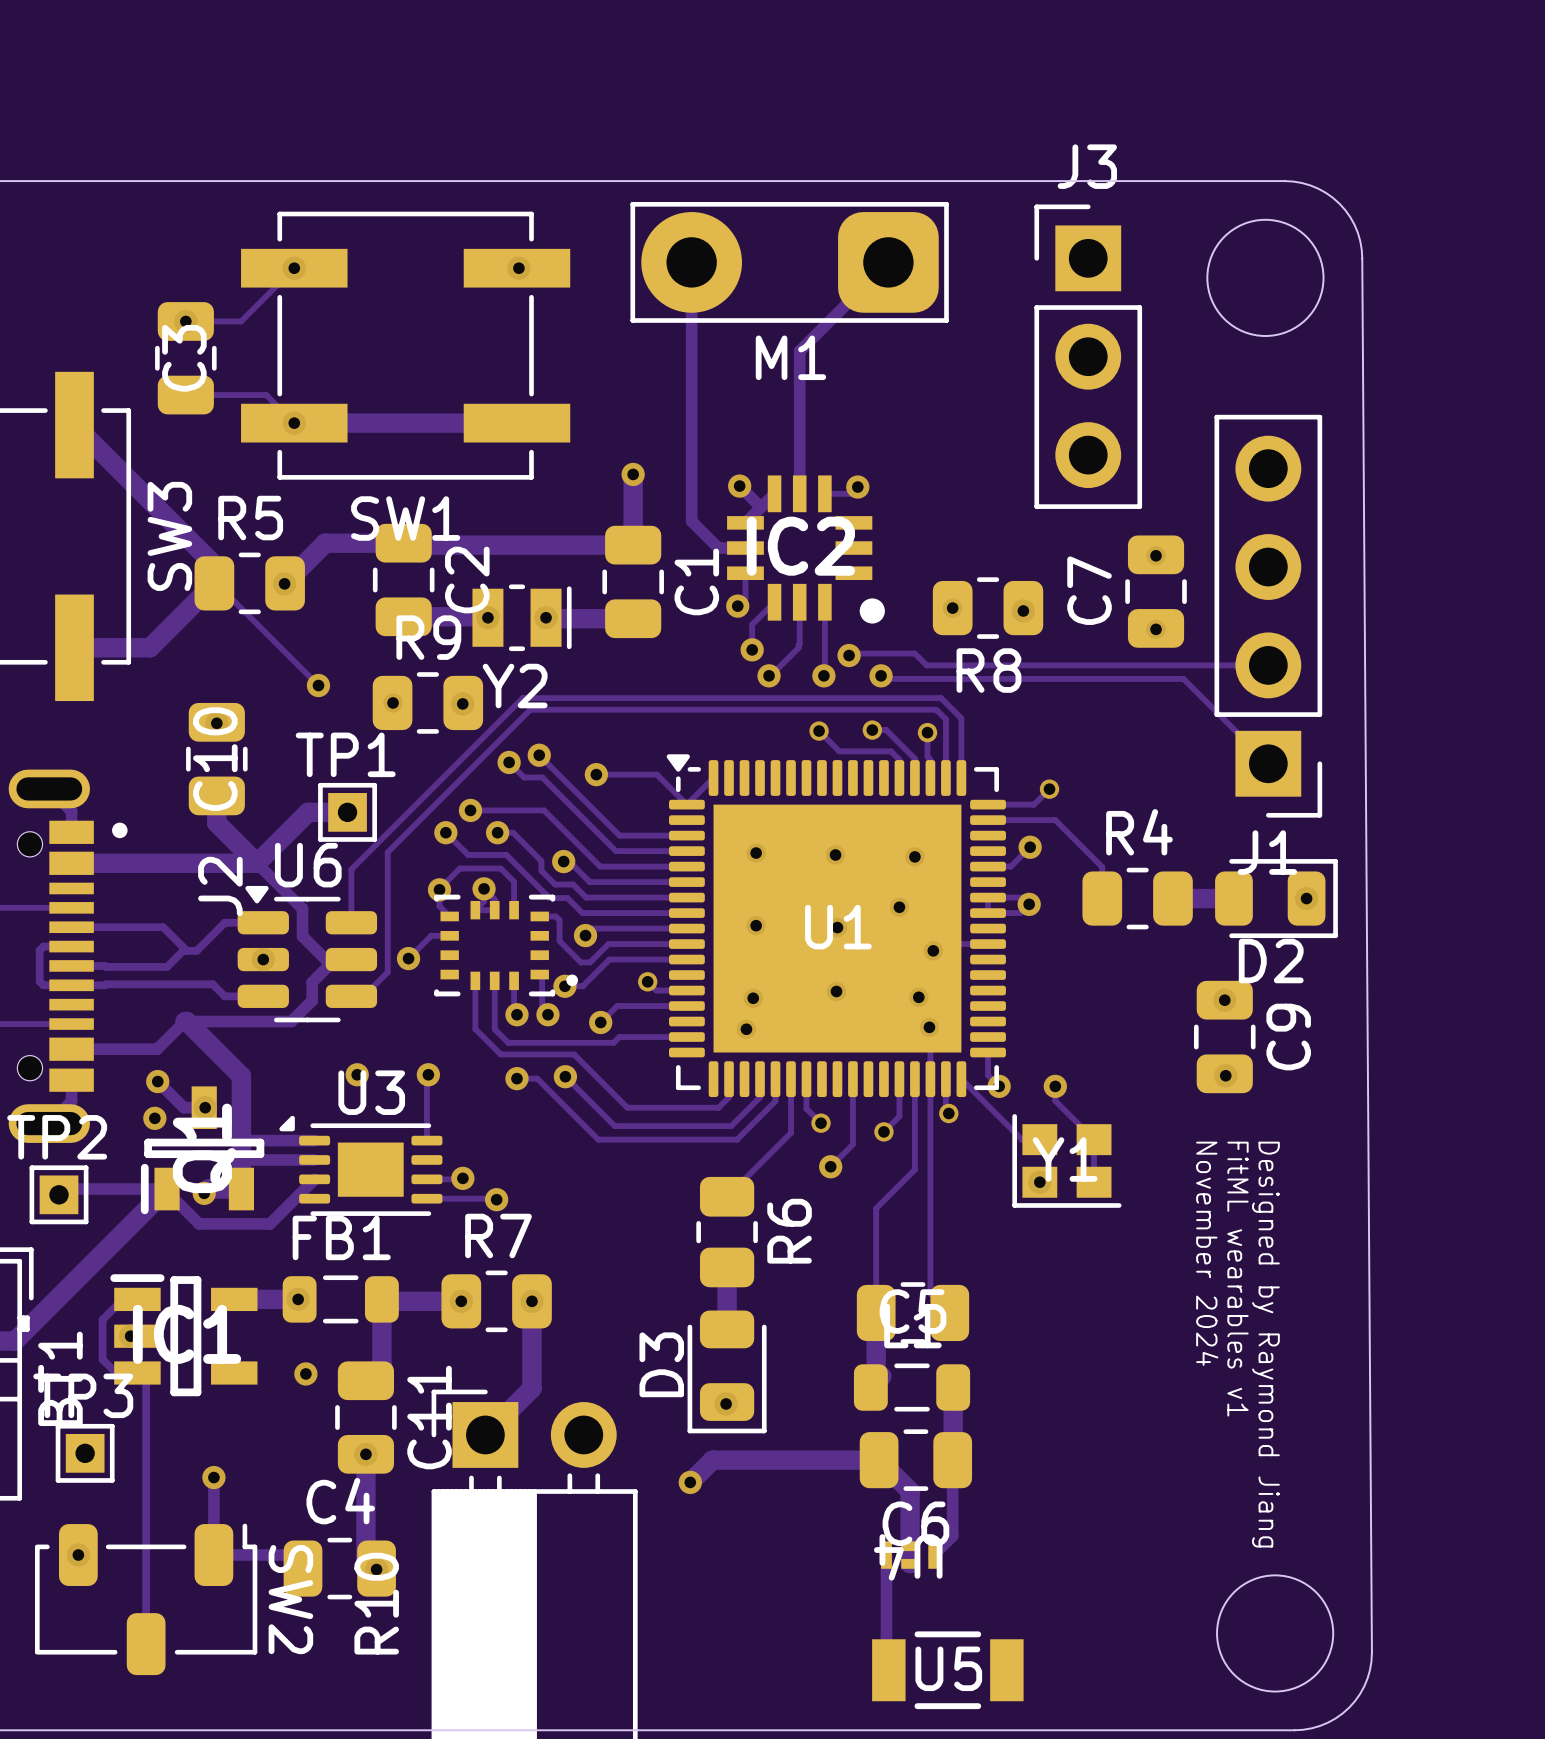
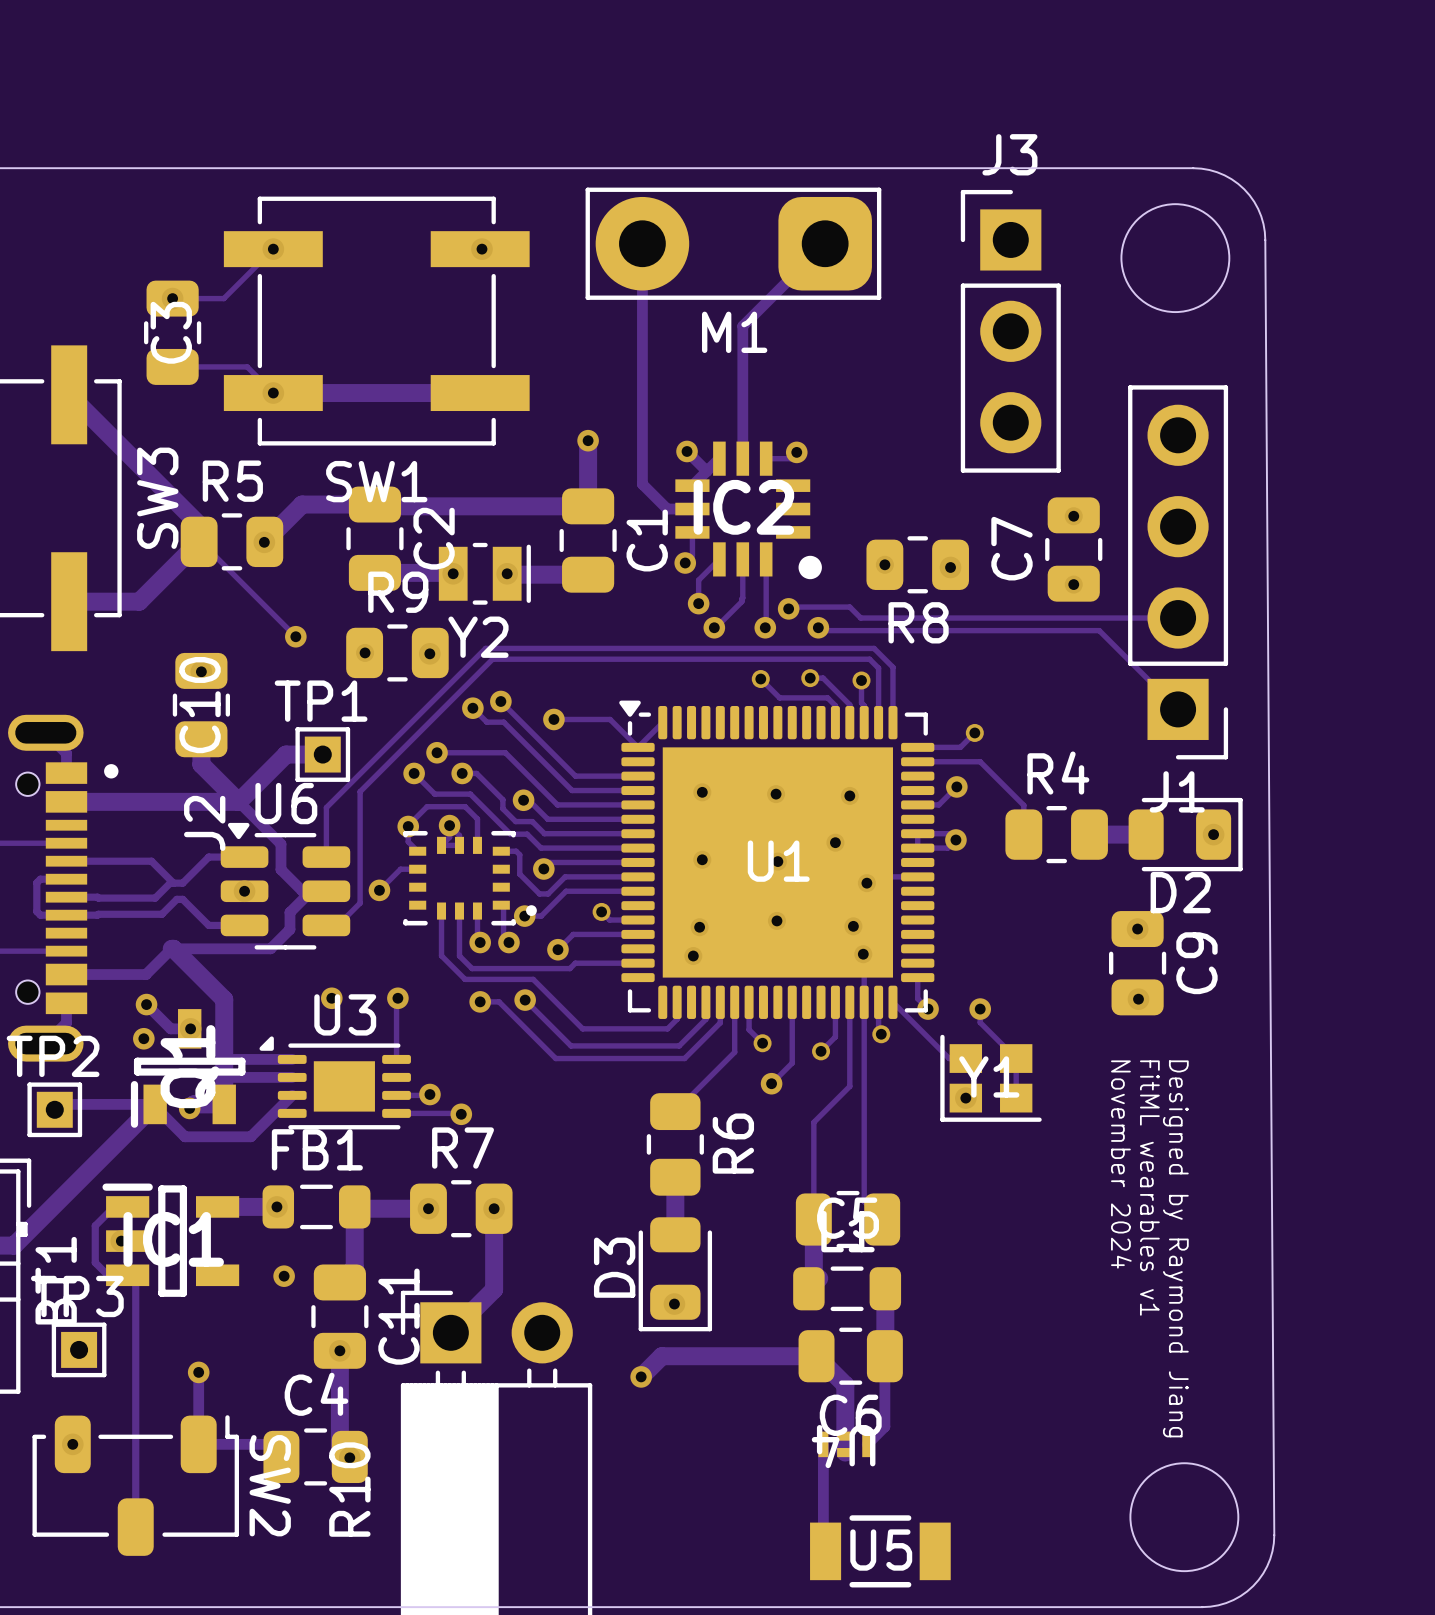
track: (174, 984) (212, 984) -> (161, 914) (176, 899) (182, 899) (197, 914)

